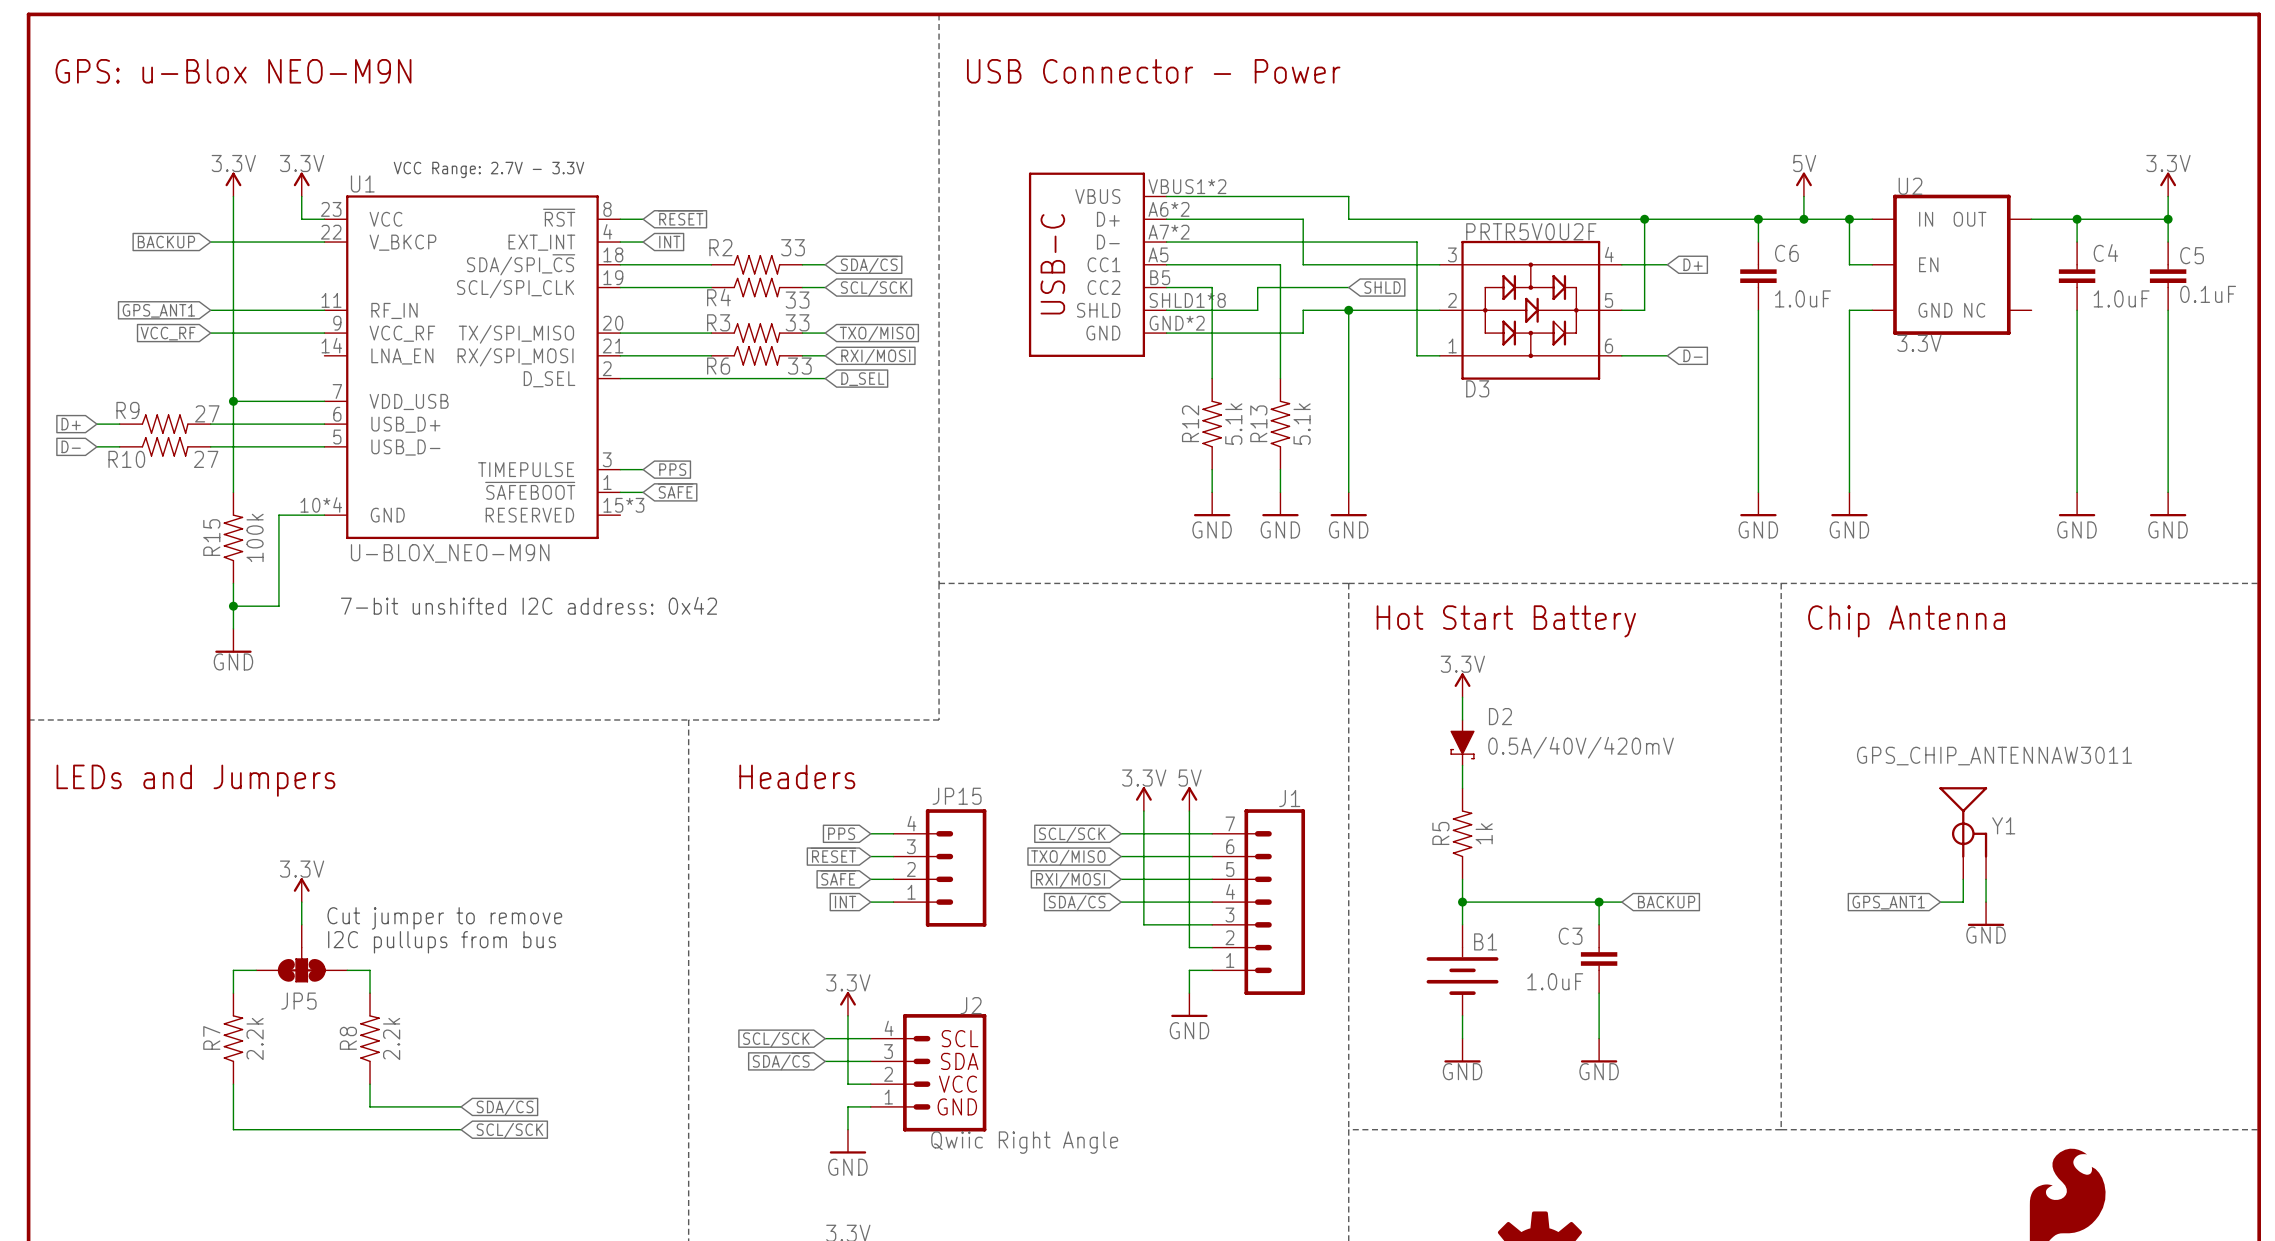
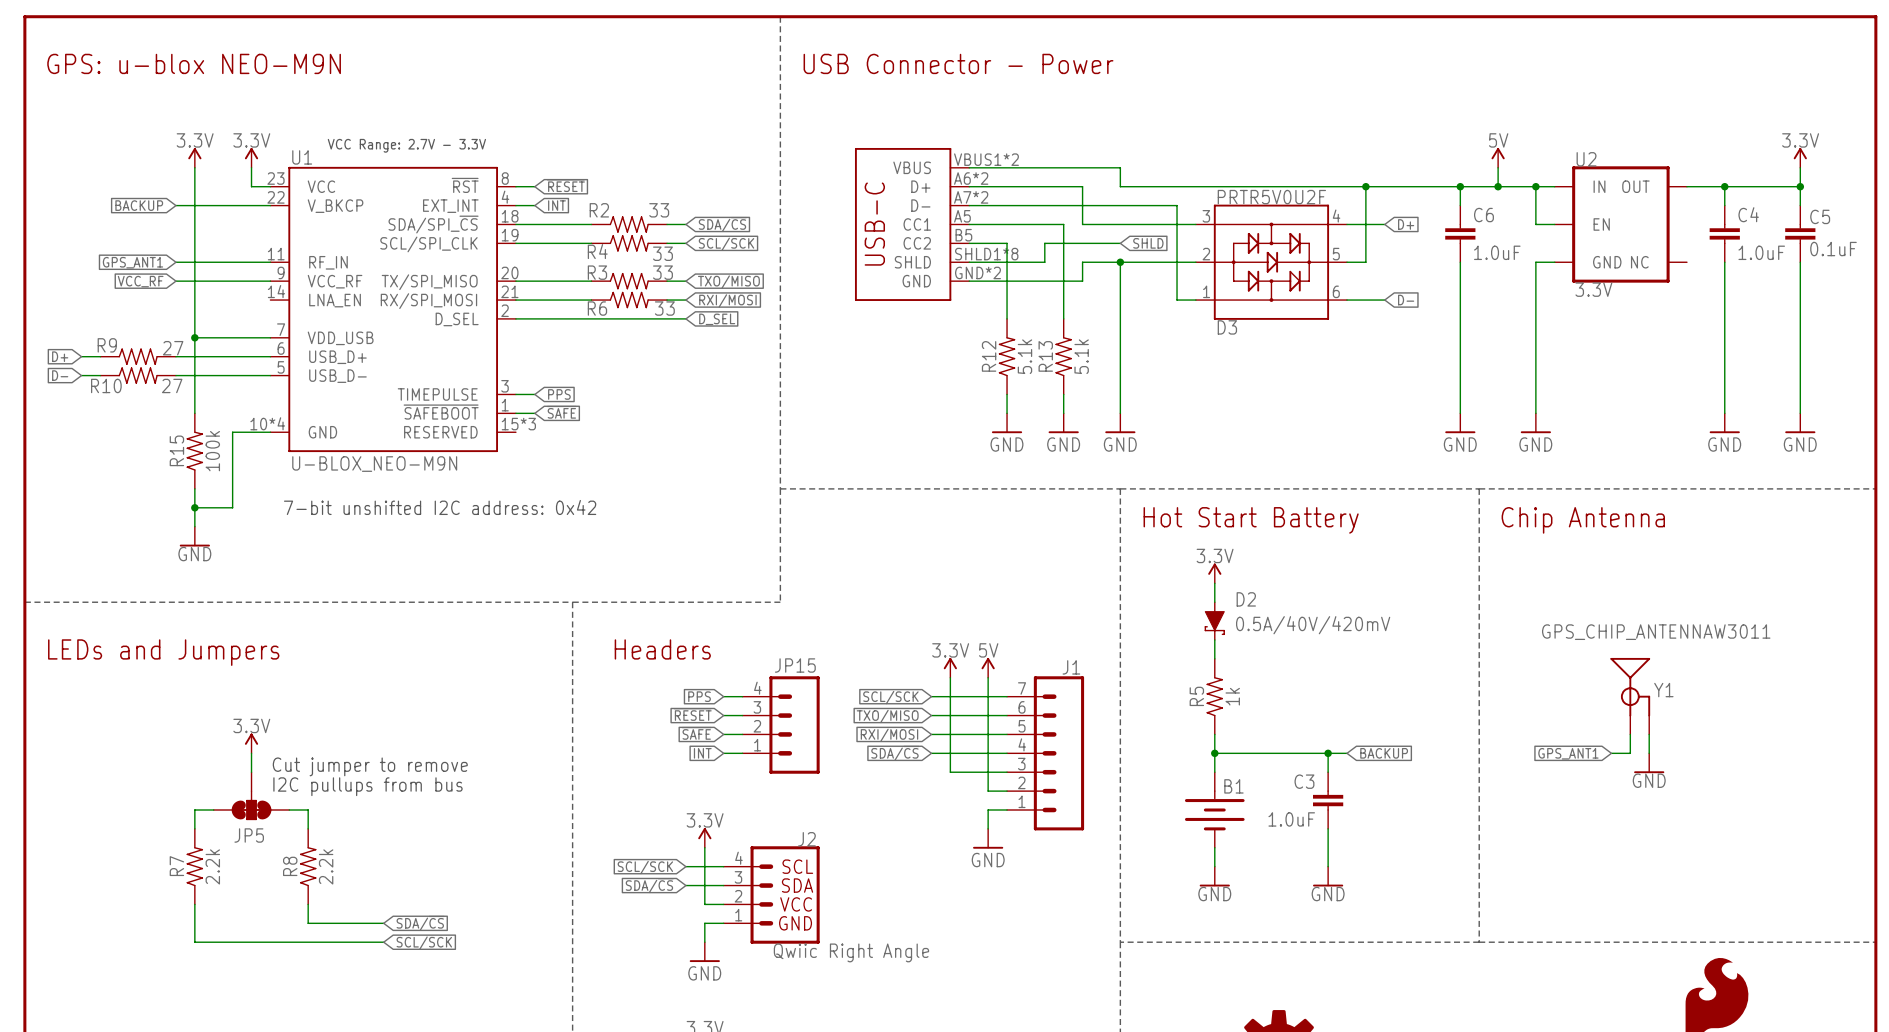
text: GPS: u-Blox NEO-M9N (233, 71) -> GPS: u-blox NEO-M9N (194, 63)

